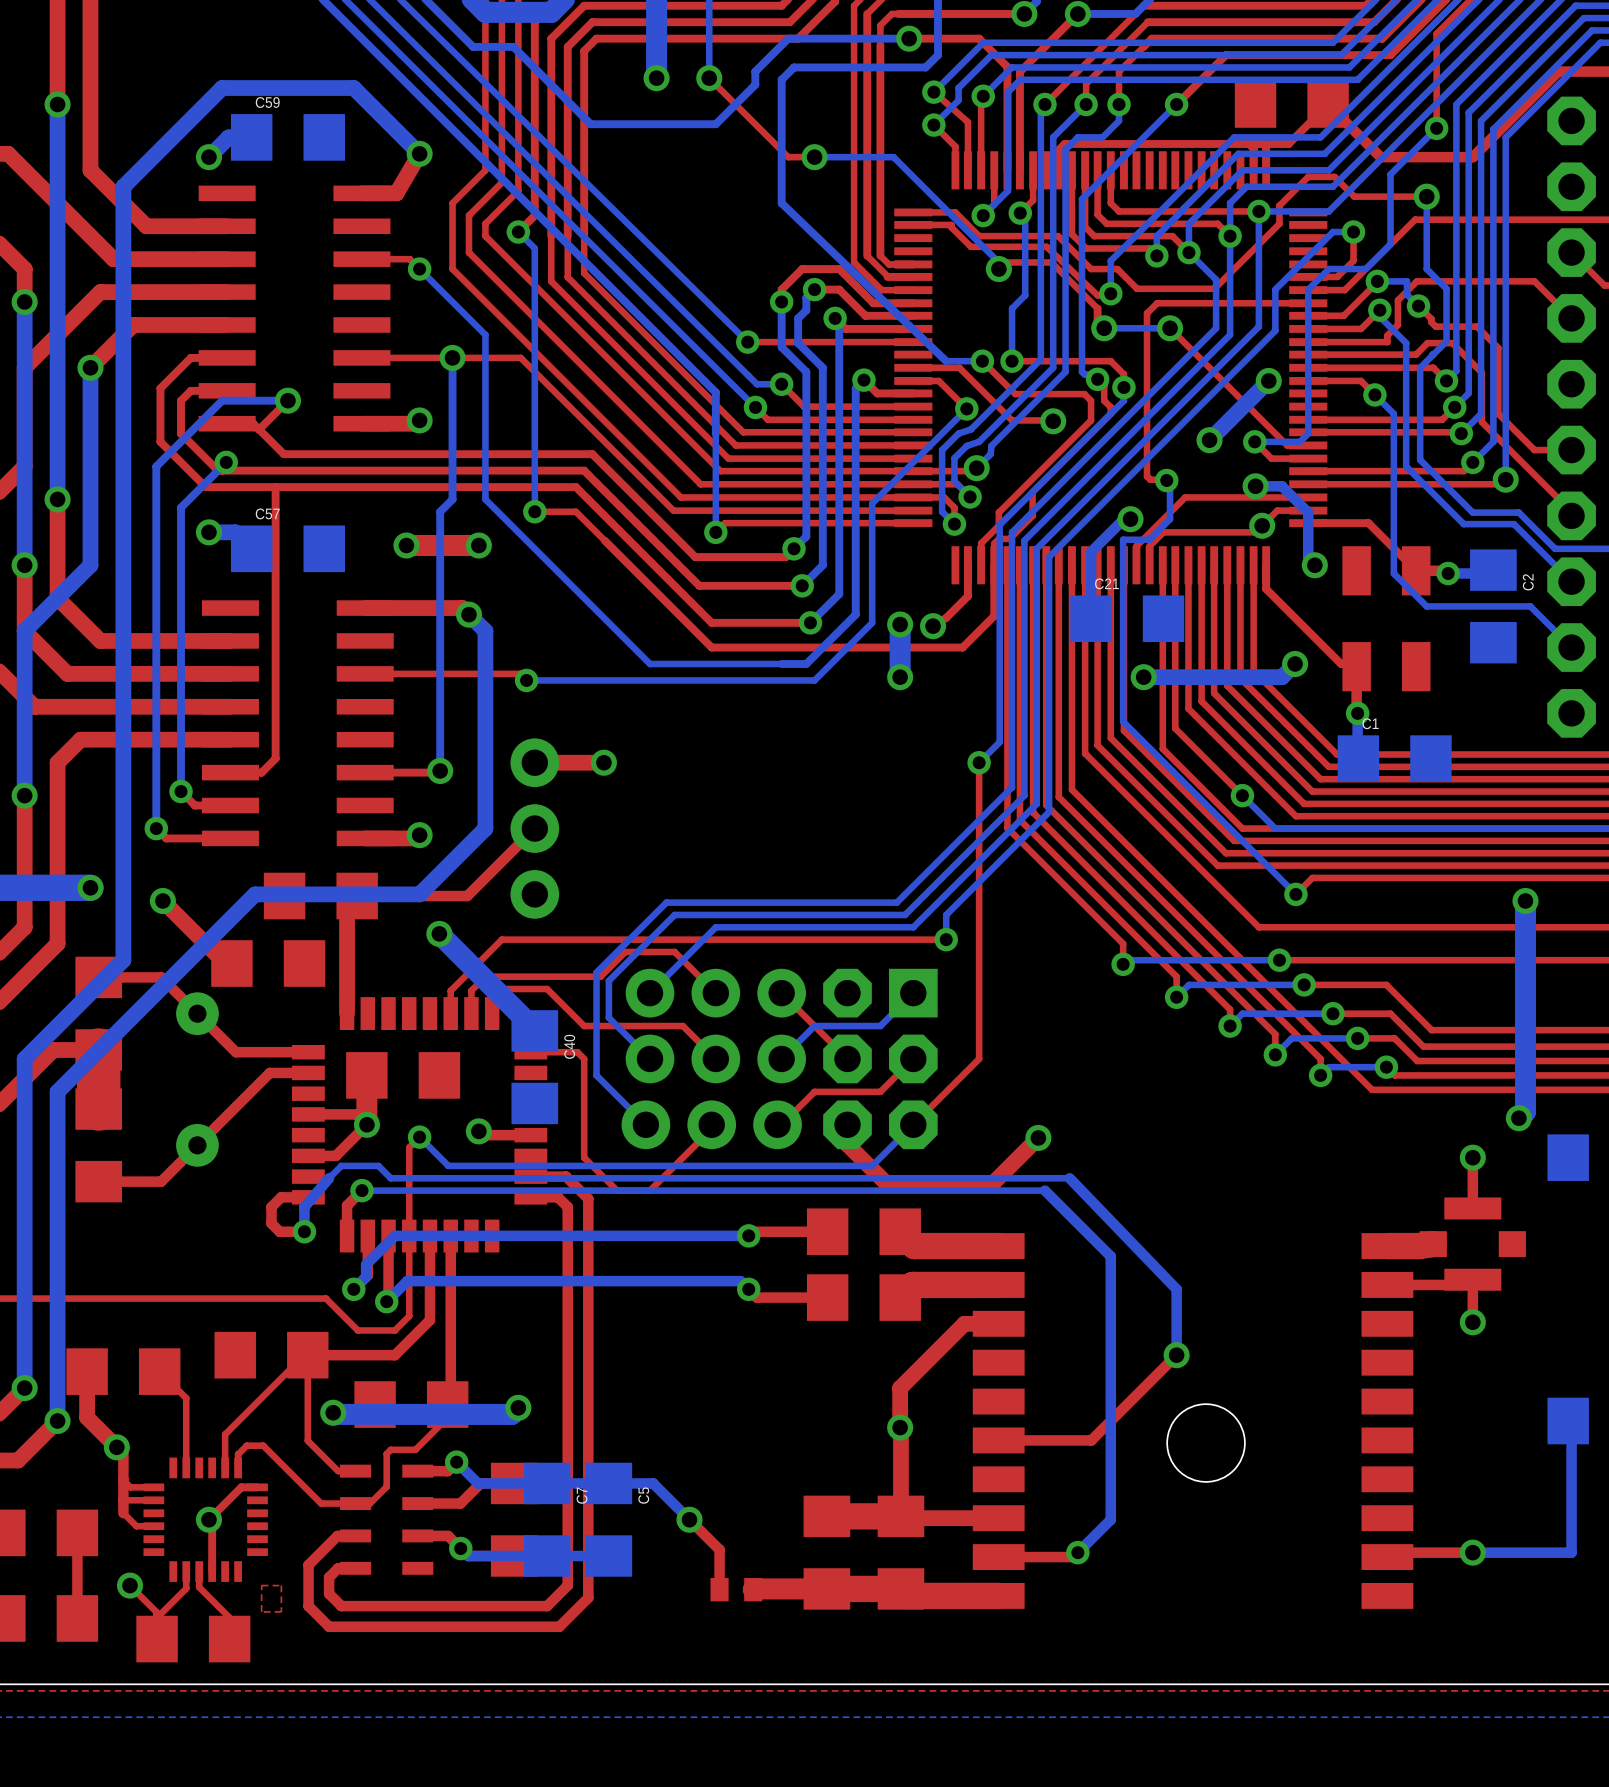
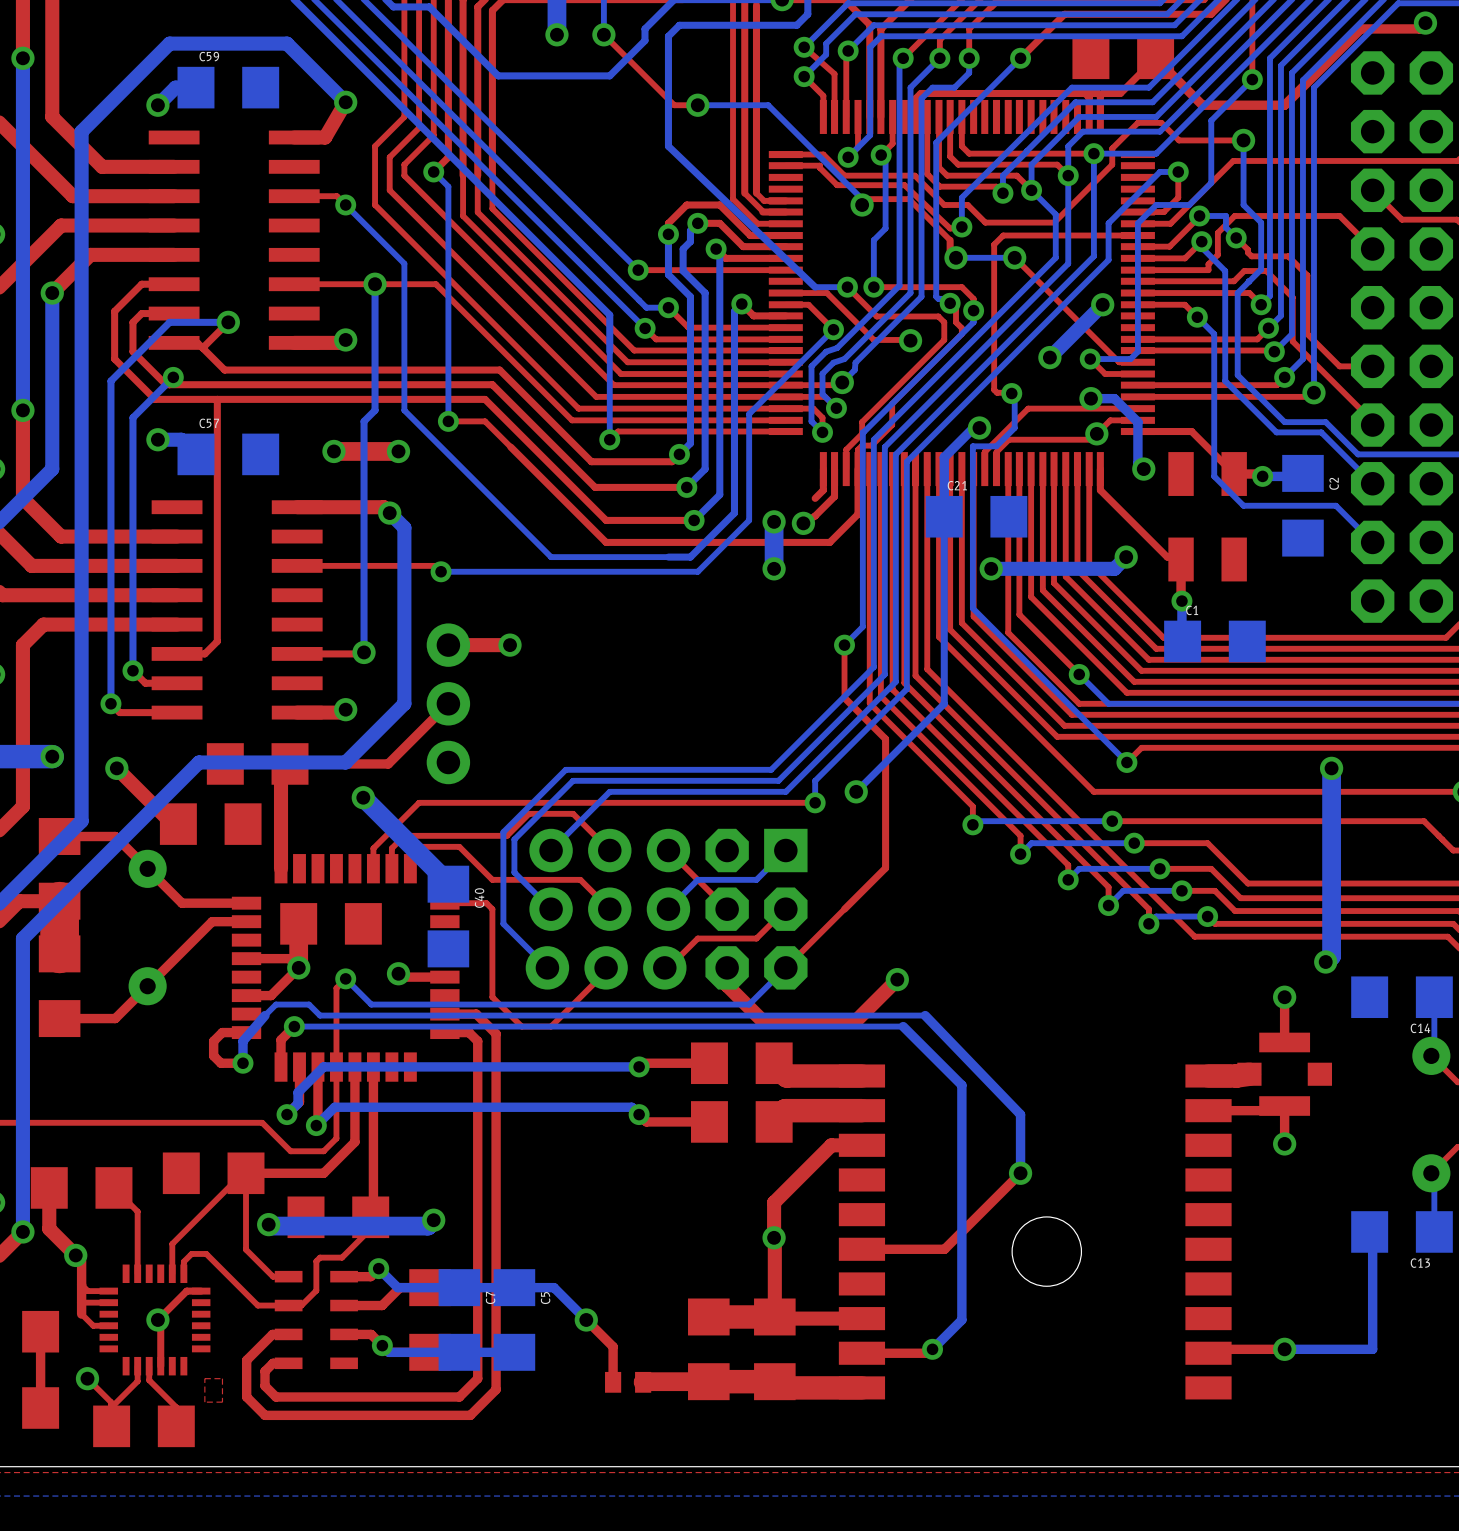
top track: none -> (823, 469) (823, 490) (815, 498)
bottom track: none -> (944, 516) (944, 703) (856, 791)
top track: (979, 821) (979, 1058) -> (844, 697) (885, 739) (885, 868) (844, 909)
via: none -> (856, 791)

